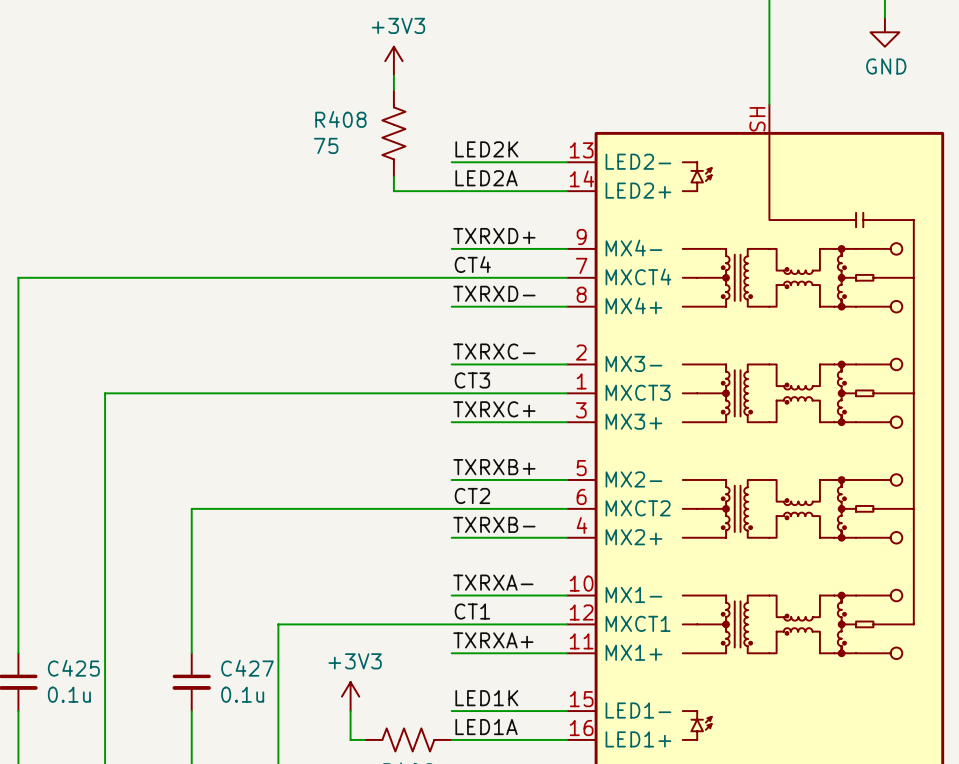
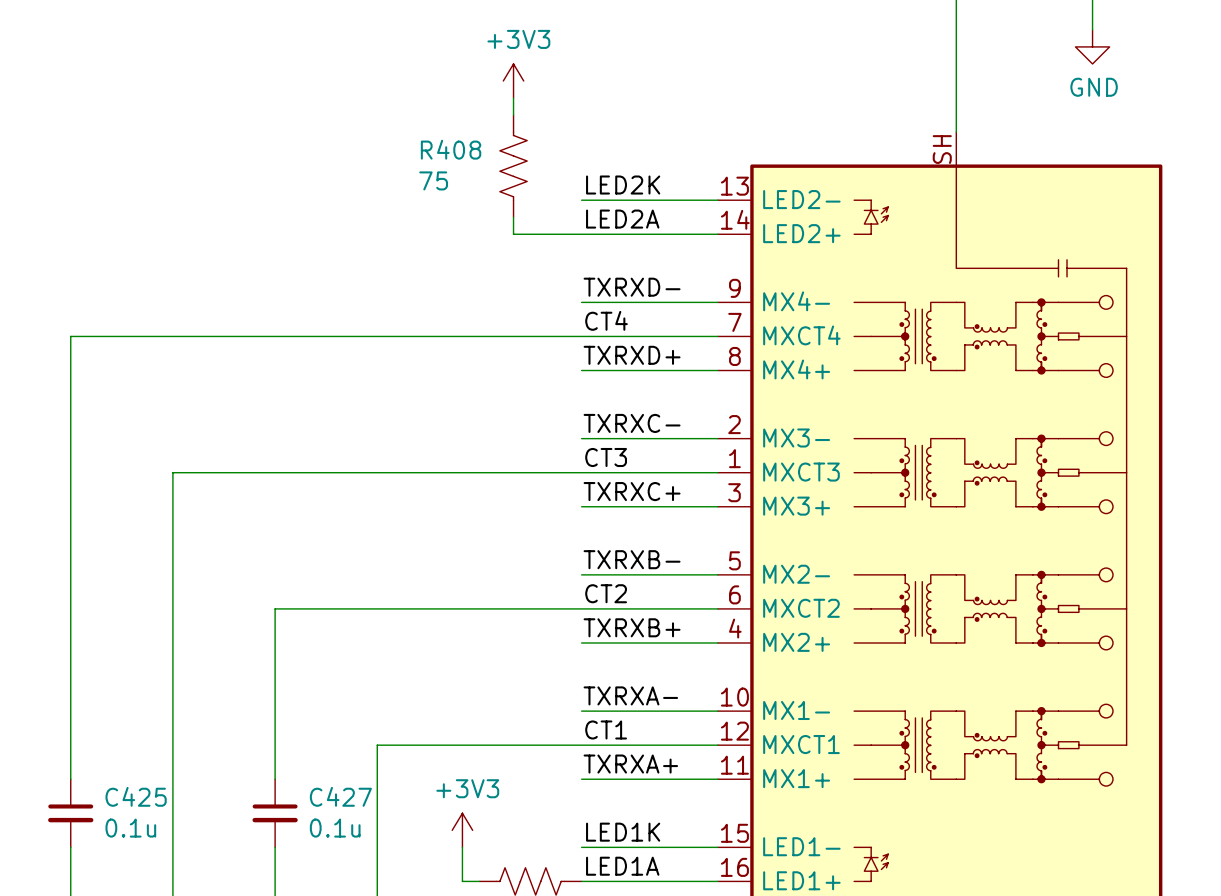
label: TXRXD+ (494, 236) -> TXRXD- (632, 287)
label: TXRXD- (494, 293) -> TXRXD+ (632, 355)
label: TXRXB+ (494, 467) -> TXRXB- (632, 559)
label: TXRXB- (494, 524) -> TXRXB+ (632, 627)

